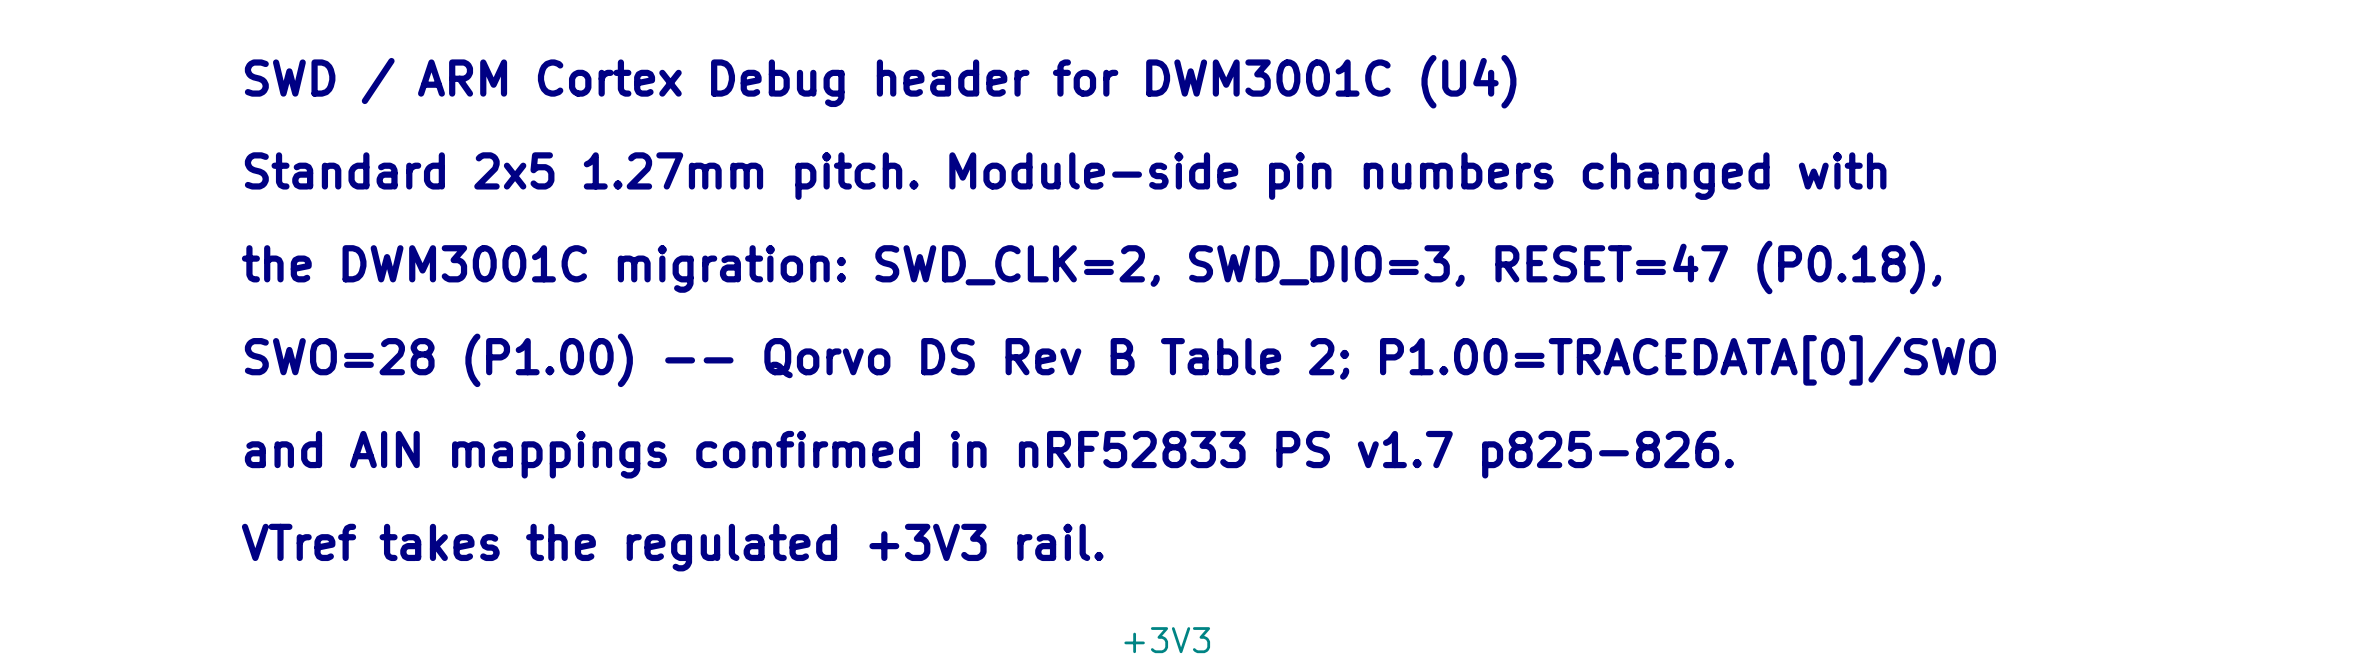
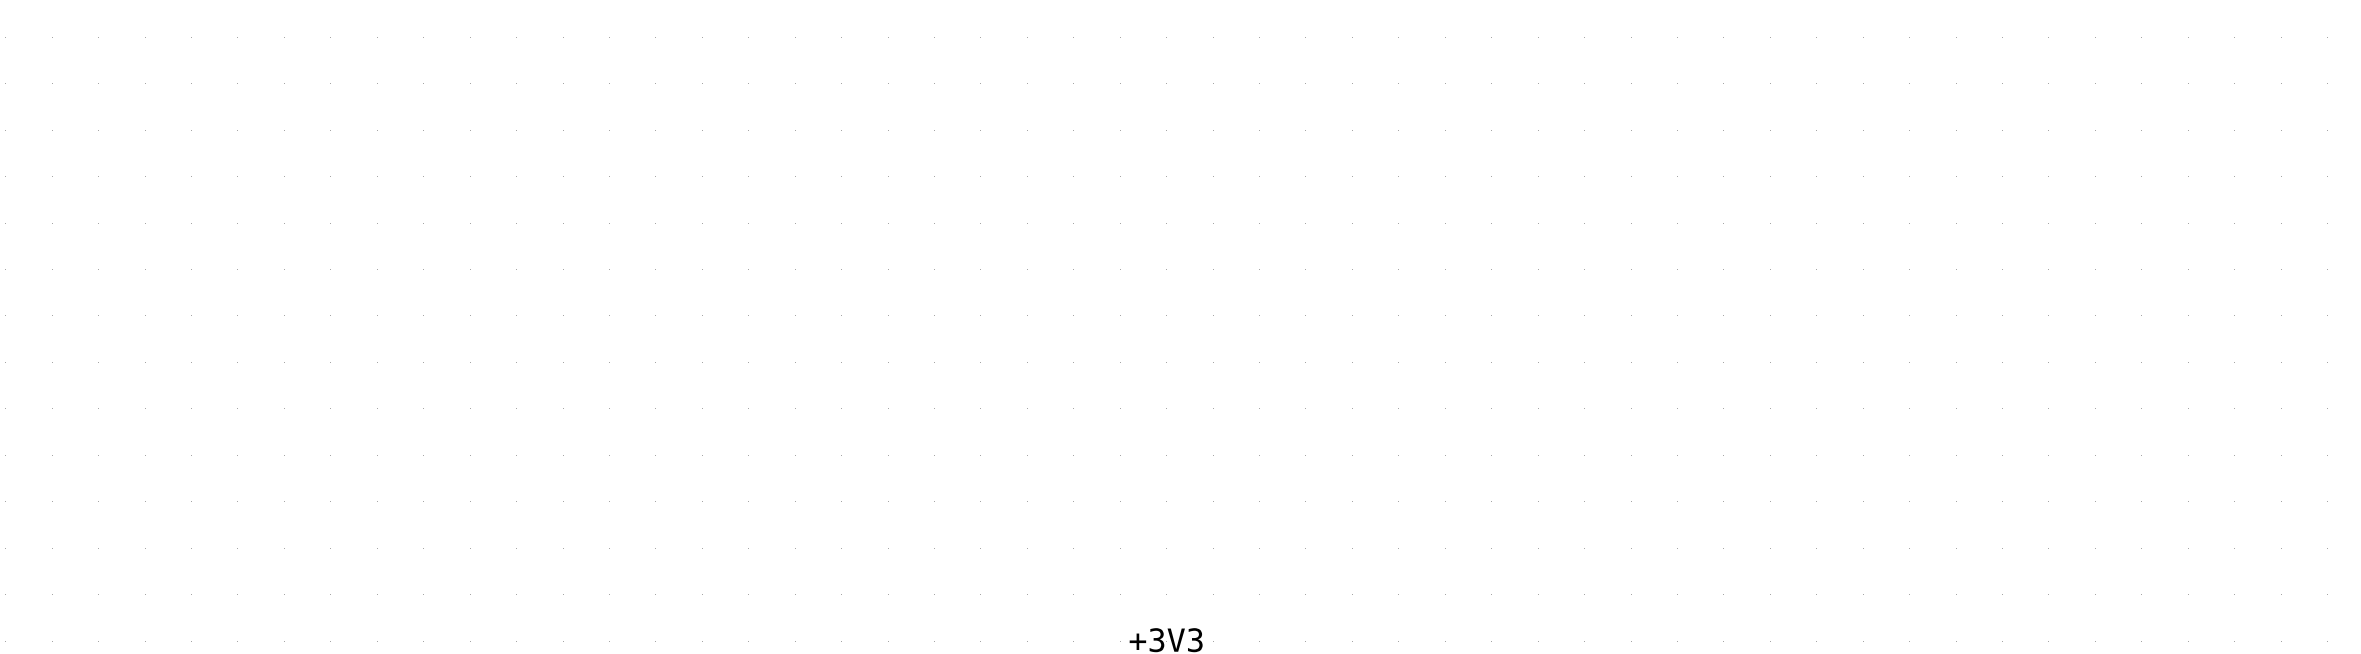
text: SWD / ARM Cortex Debug header for DWM3001C (U4) (880, 81) -> none
text: Standard 2x5 1.27mm pitch. Module-side pin numbers changed with (1065, 176) -> none
text: the DWM3001C migration: SWD_CLK=2, SWD_DIO=3, RESET=47 (P0.18), (1091, 267) -> none
text: SWO=28 (P1.00) -- Qorvo DS Rev B Table 2; P1.00=TRACEDATA[0]/SWO (1120, 360) -> none
text: and AIN mappings confirmed in nRF52833 PS v1.7 p825-826. (989, 454) -> none
text: VTref takes the regulated +3V3 rail. (672, 547) -> none

